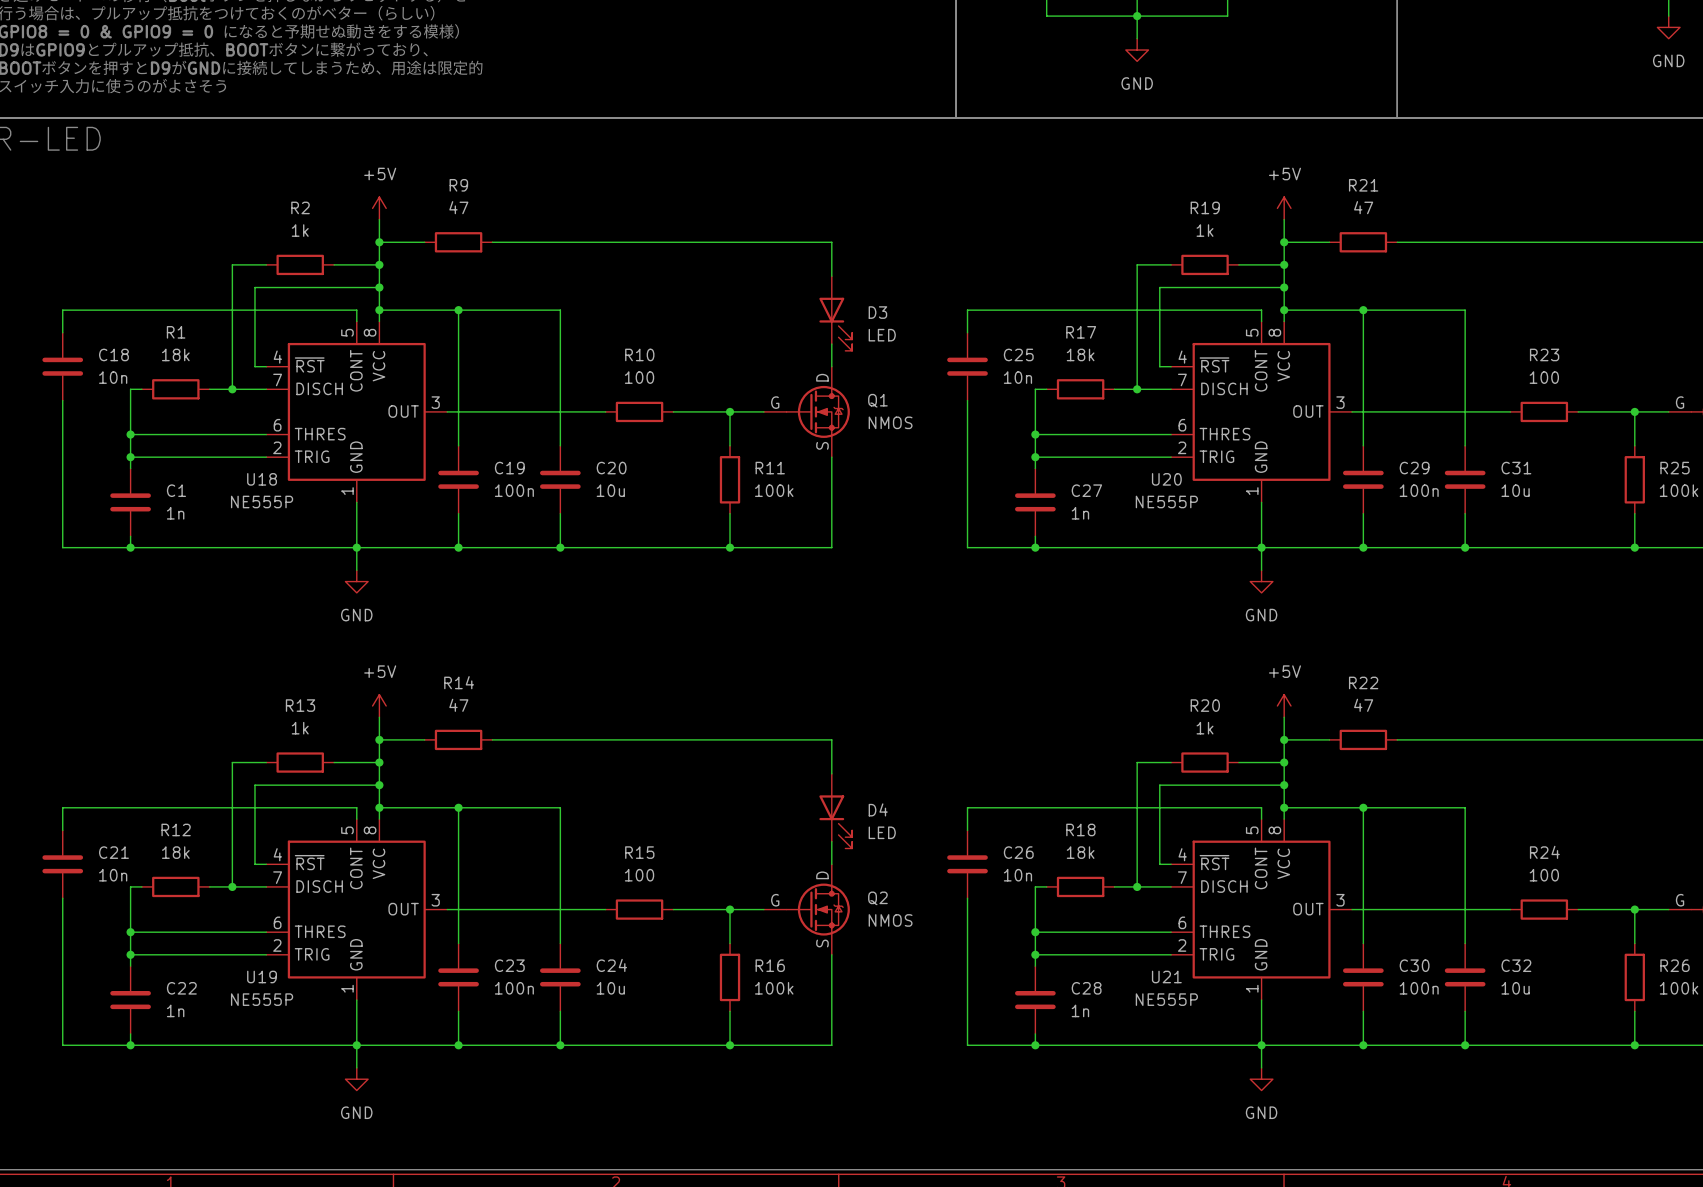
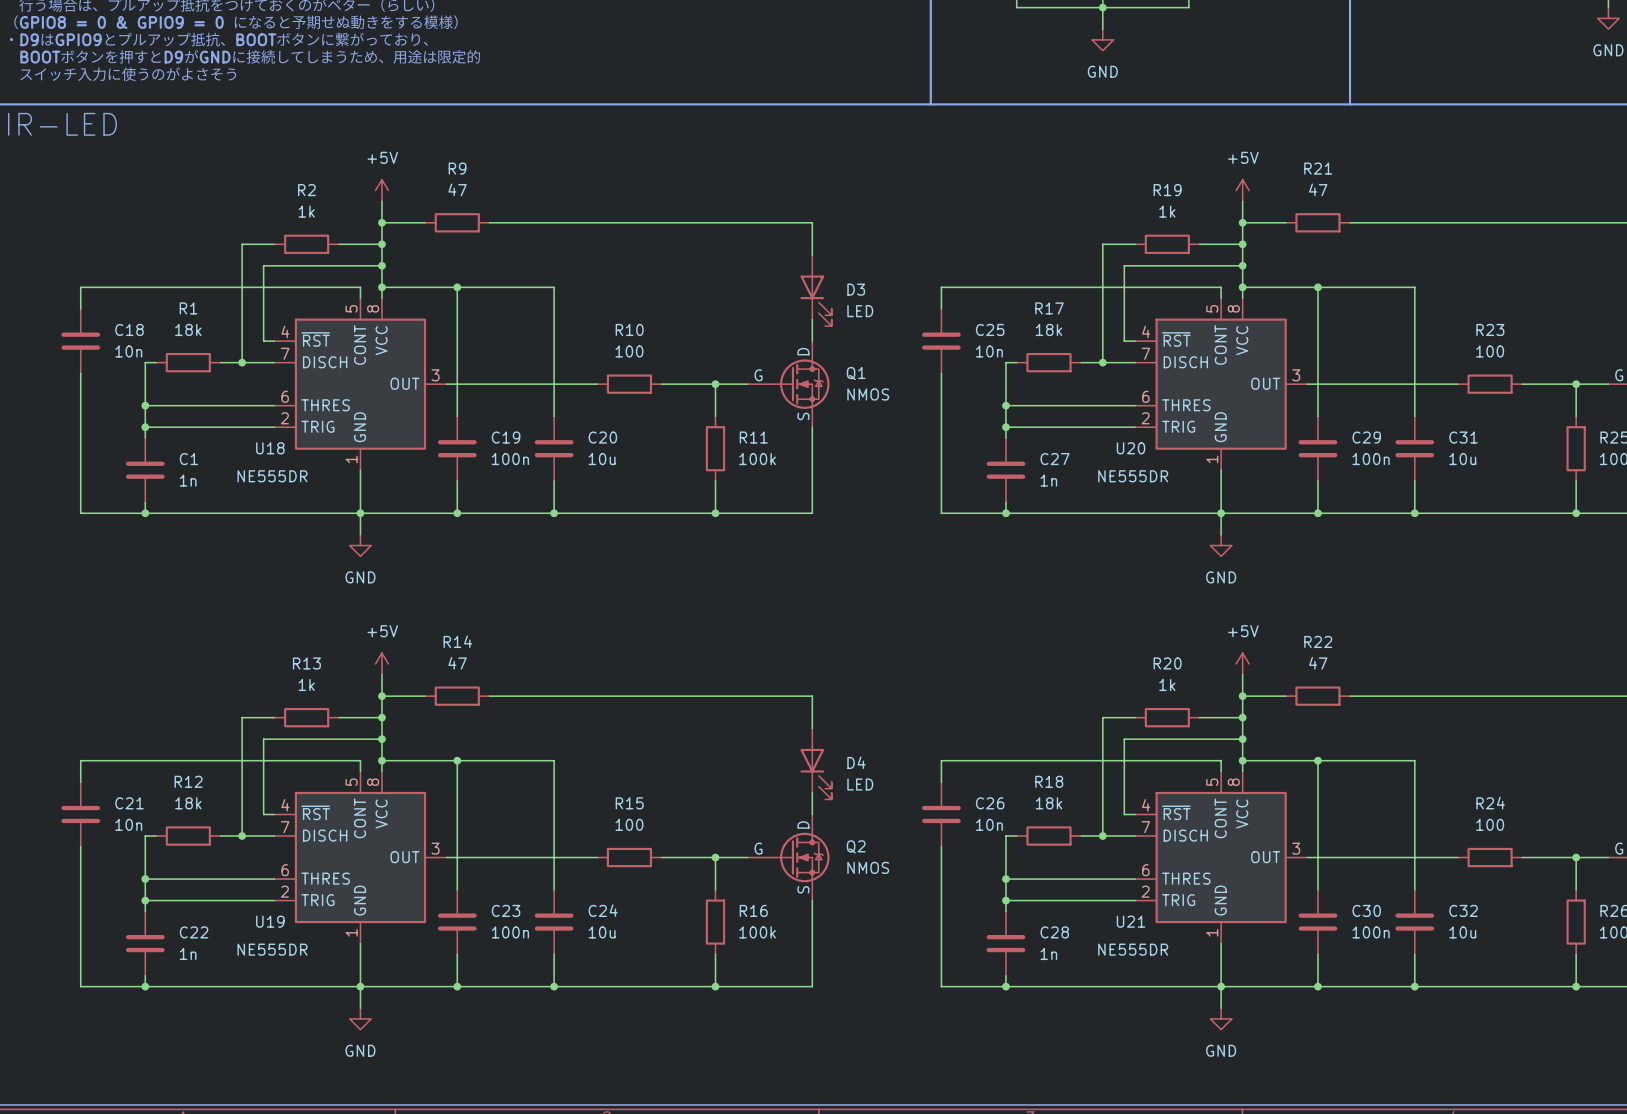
U18 value: NE555P (262, 501) -> NE555DR (272, 476)
U20 value: NE555P (1166, 501) -> NE555DR (1133, 476)
U19 value: NE555P (262, 999) -> NE555DR (272, 949)
U21 value: NE555P (1166, 999) -> NE555DR (1133, 949)

